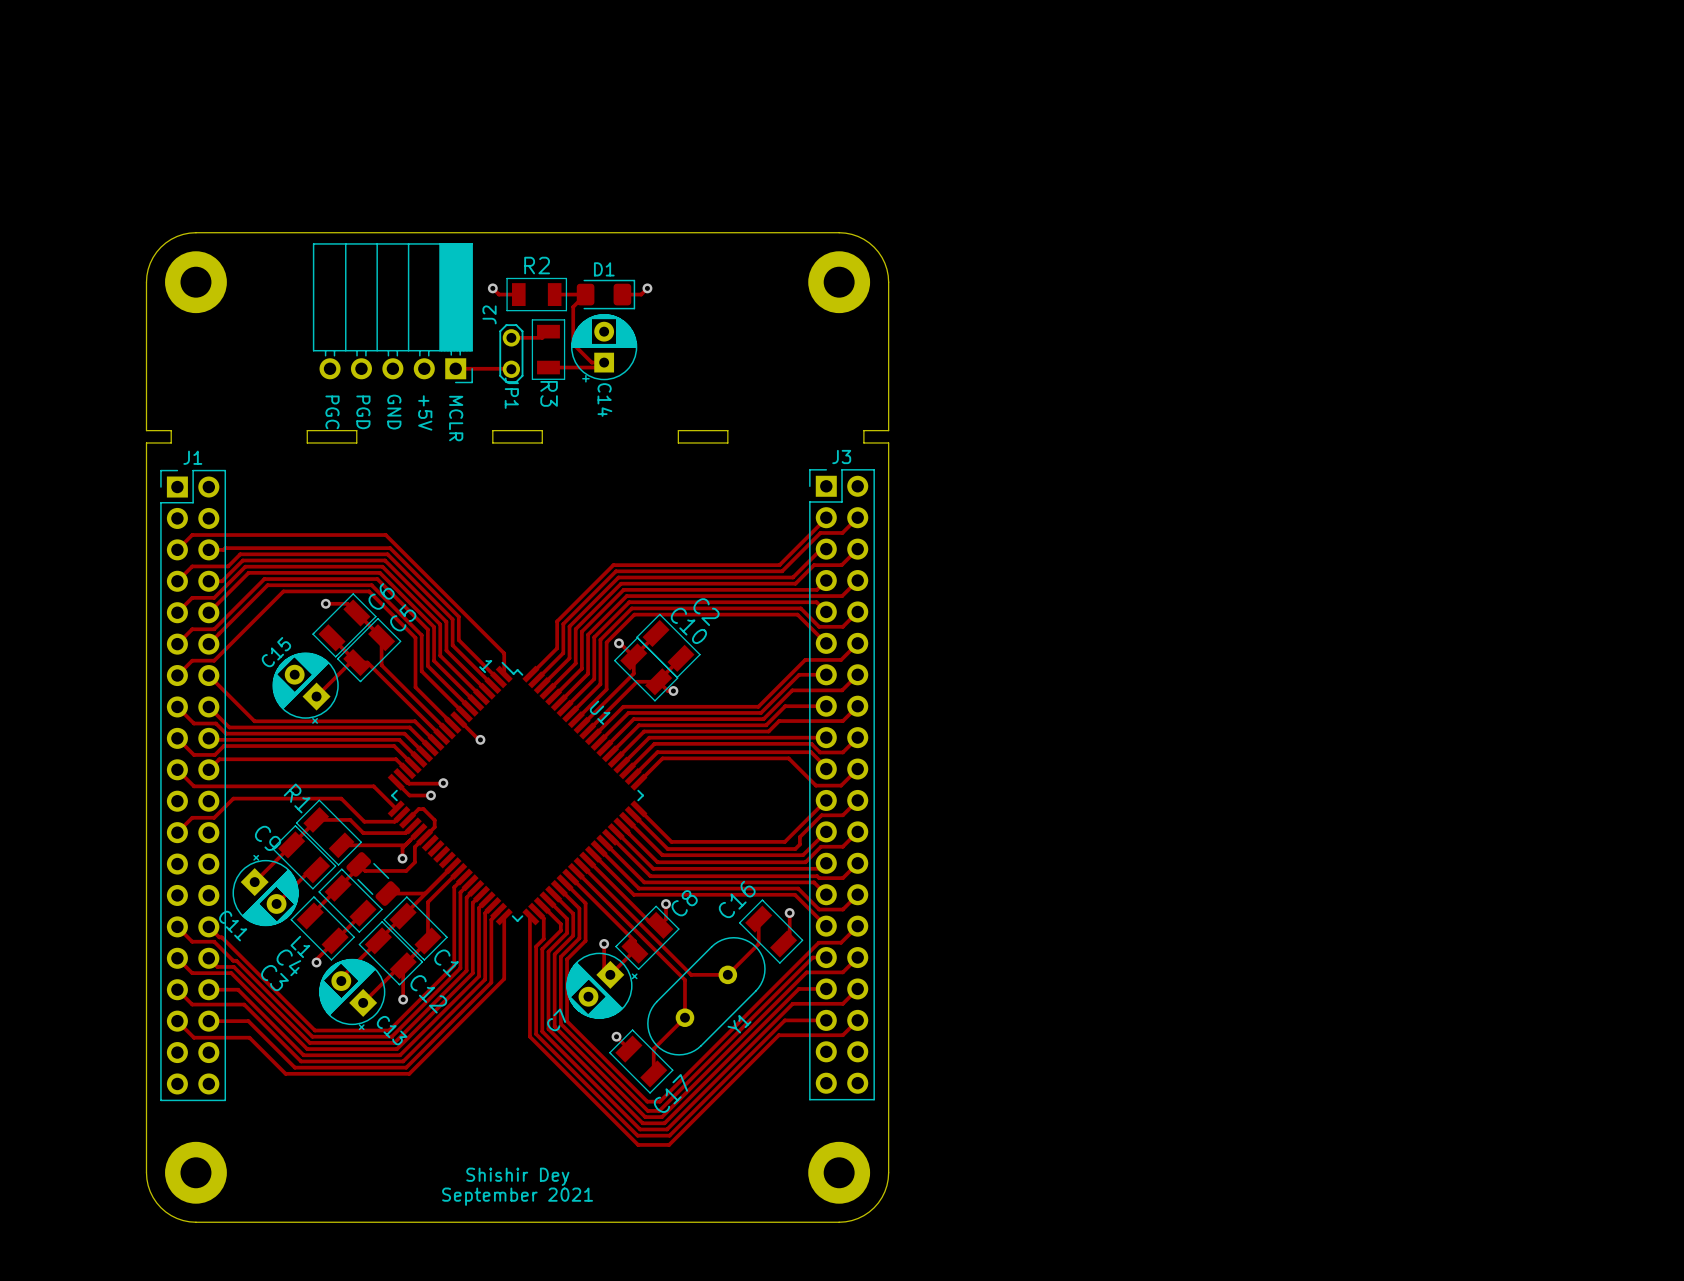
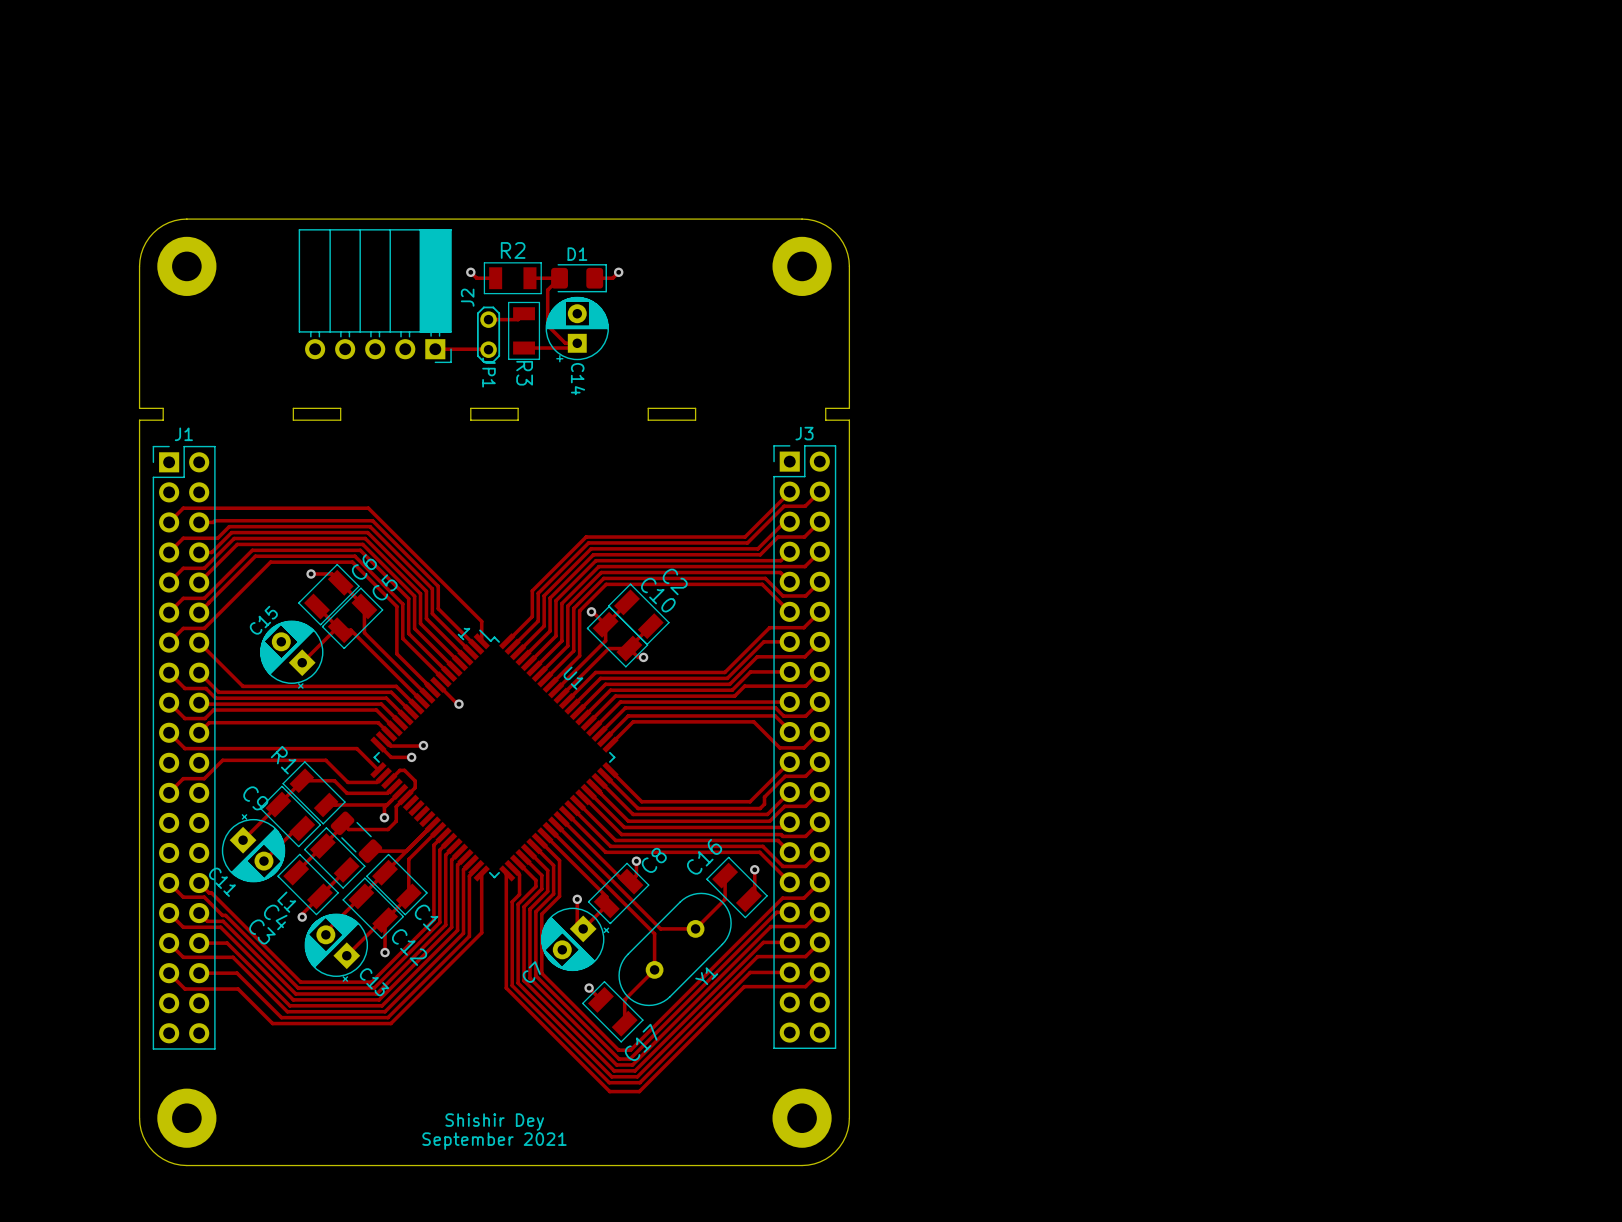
text: PGC (332, 412) -> none
text: PGD (363, 412) -> none
text: GND (394, 412) -> none
text: +5V (425, 412) -> none
text: MCLR (456, 418) -> none

